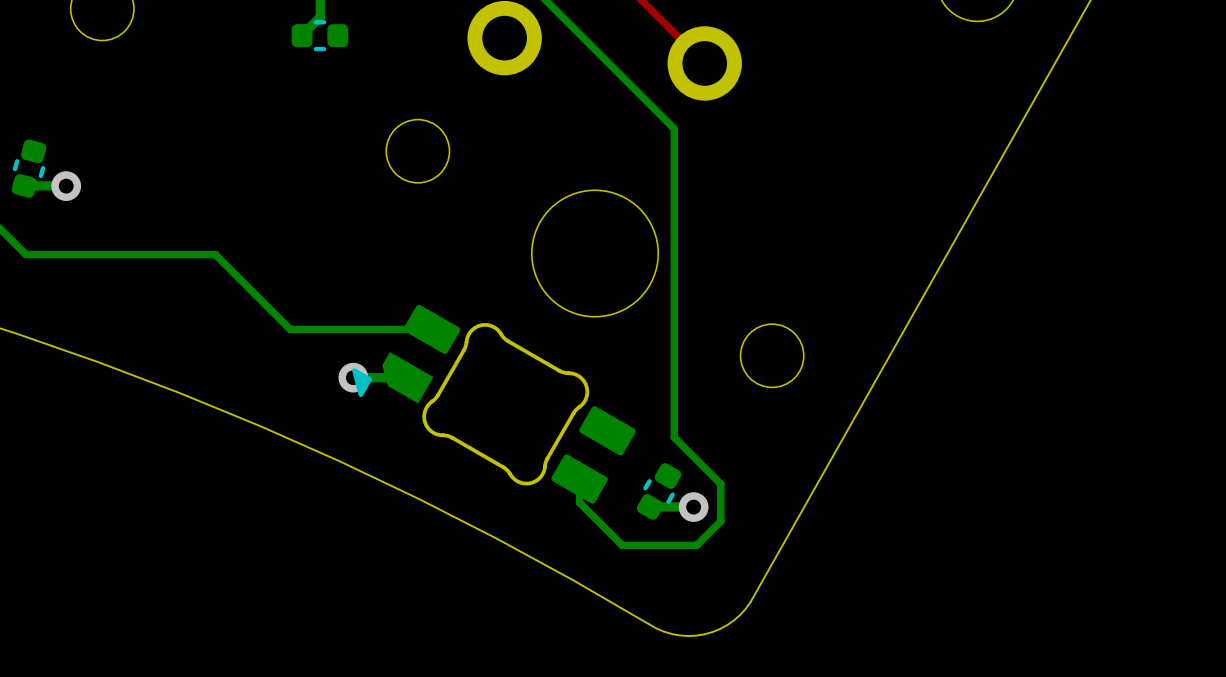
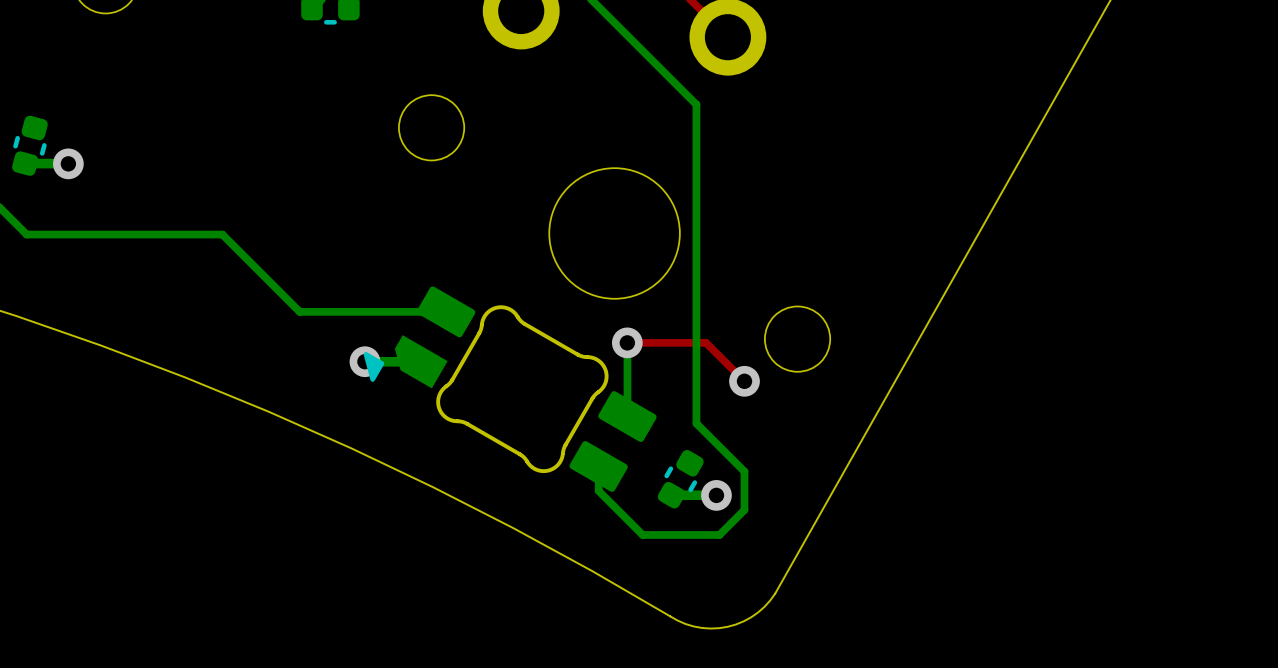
bottom track: none -> (627, 342) (627, 416)
top track: none -> (627, 342) (706, 342) (744, 381)
via: none -> (627, 342)
via: none -> (744, 381)

